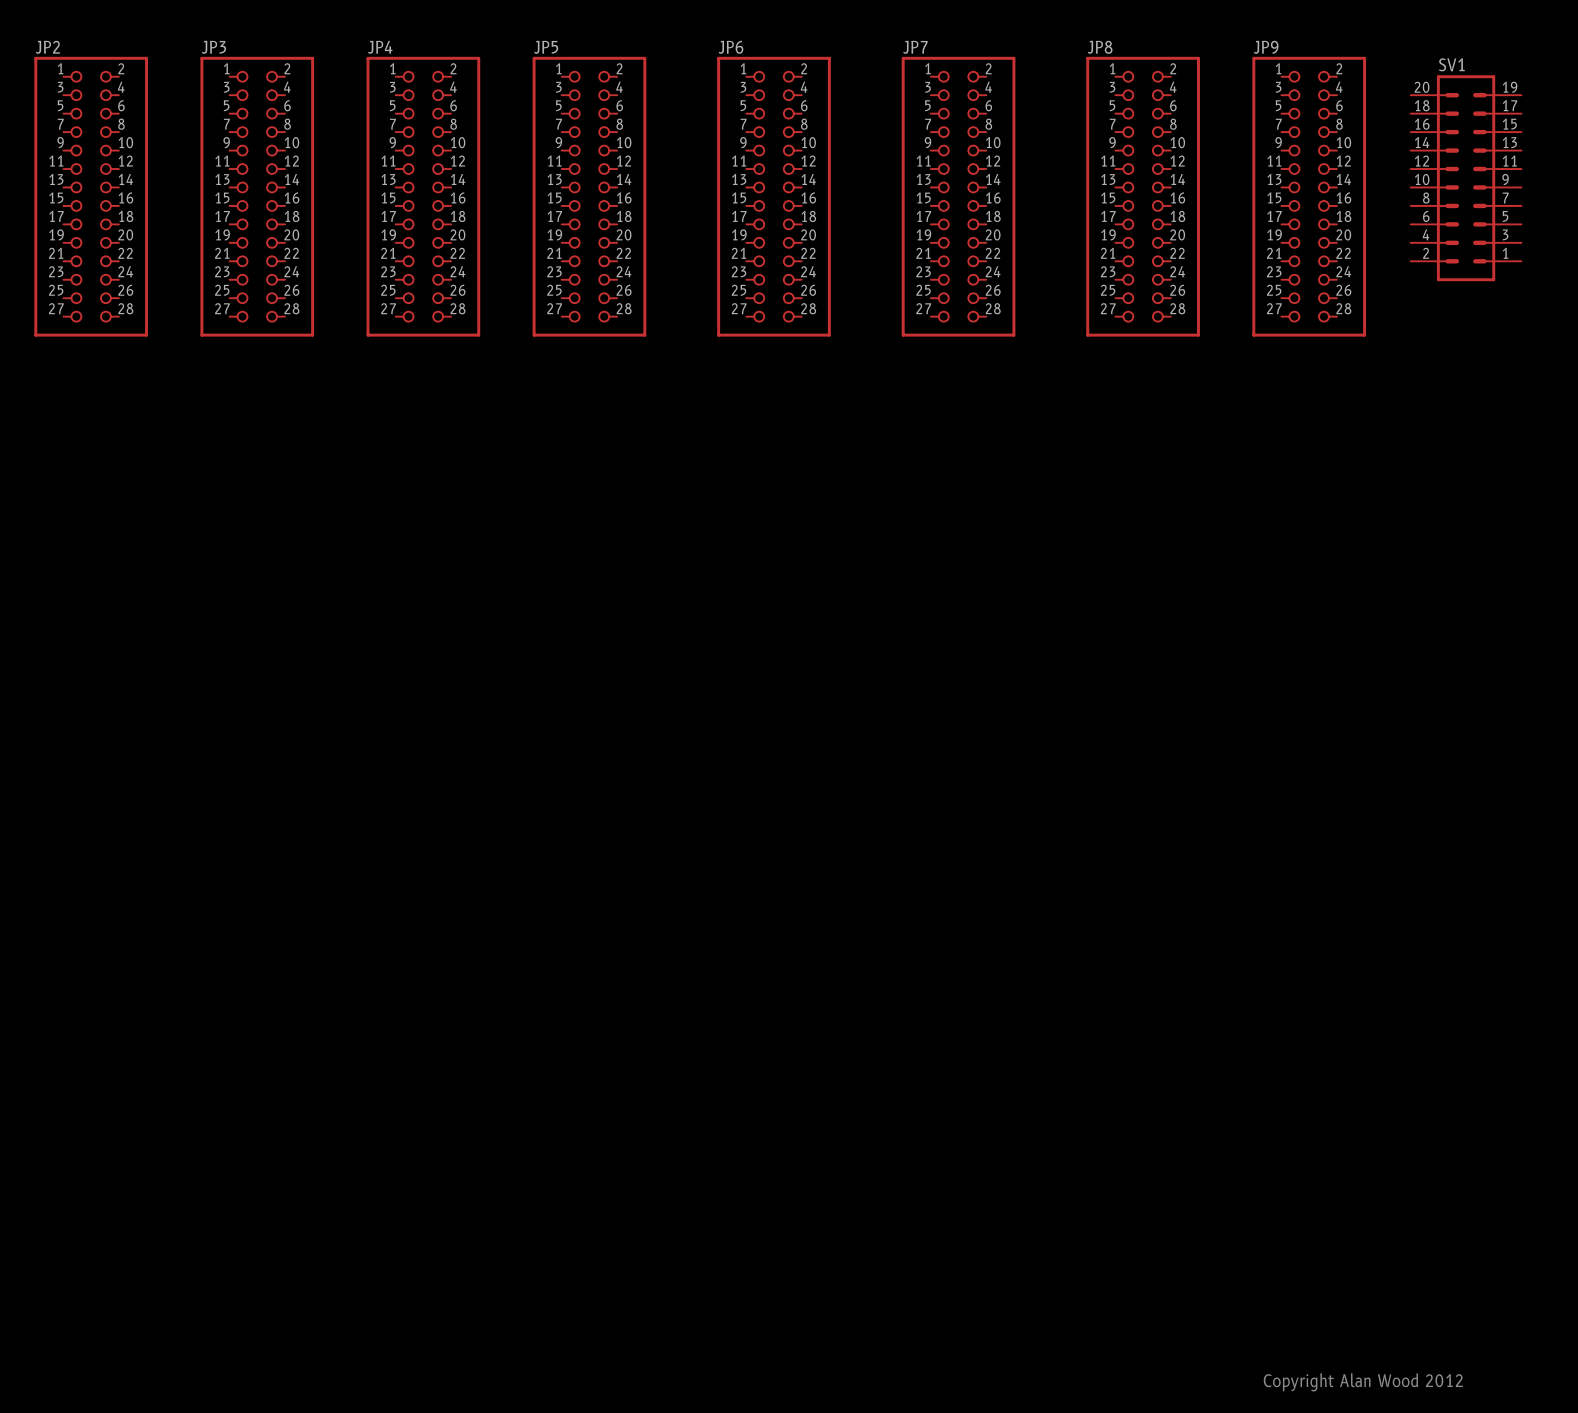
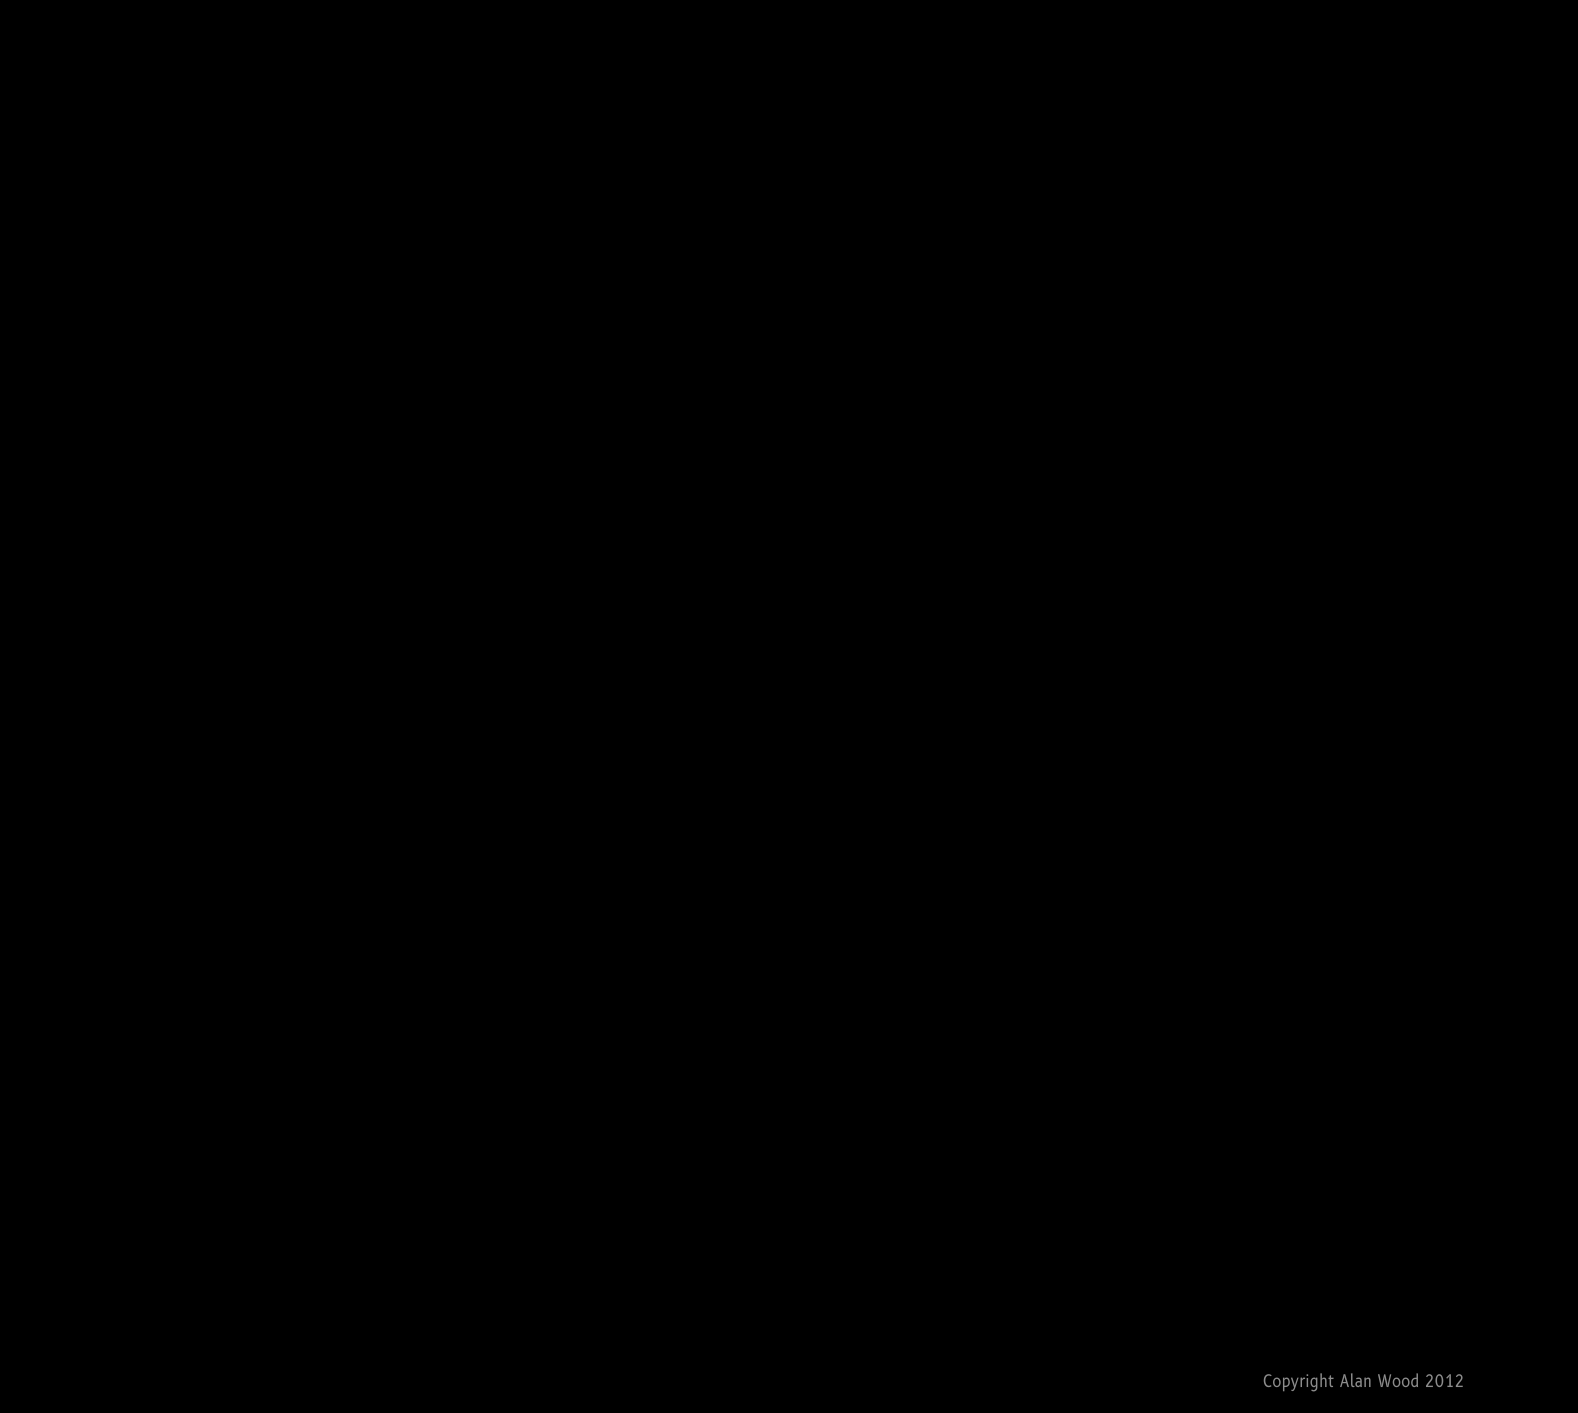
SV1: (1466, 178) -> none
JP2: (91, 196) -> none
JP3: (257, 196) -> none
JP4: (423, 196) -> none
JP5: (589, 196) -> none
JP6: (774, 196) -> none
JP7: (958, 196) -> none
JP8: (1143, 196) -> none
JP9: (1309, 196) -> none

